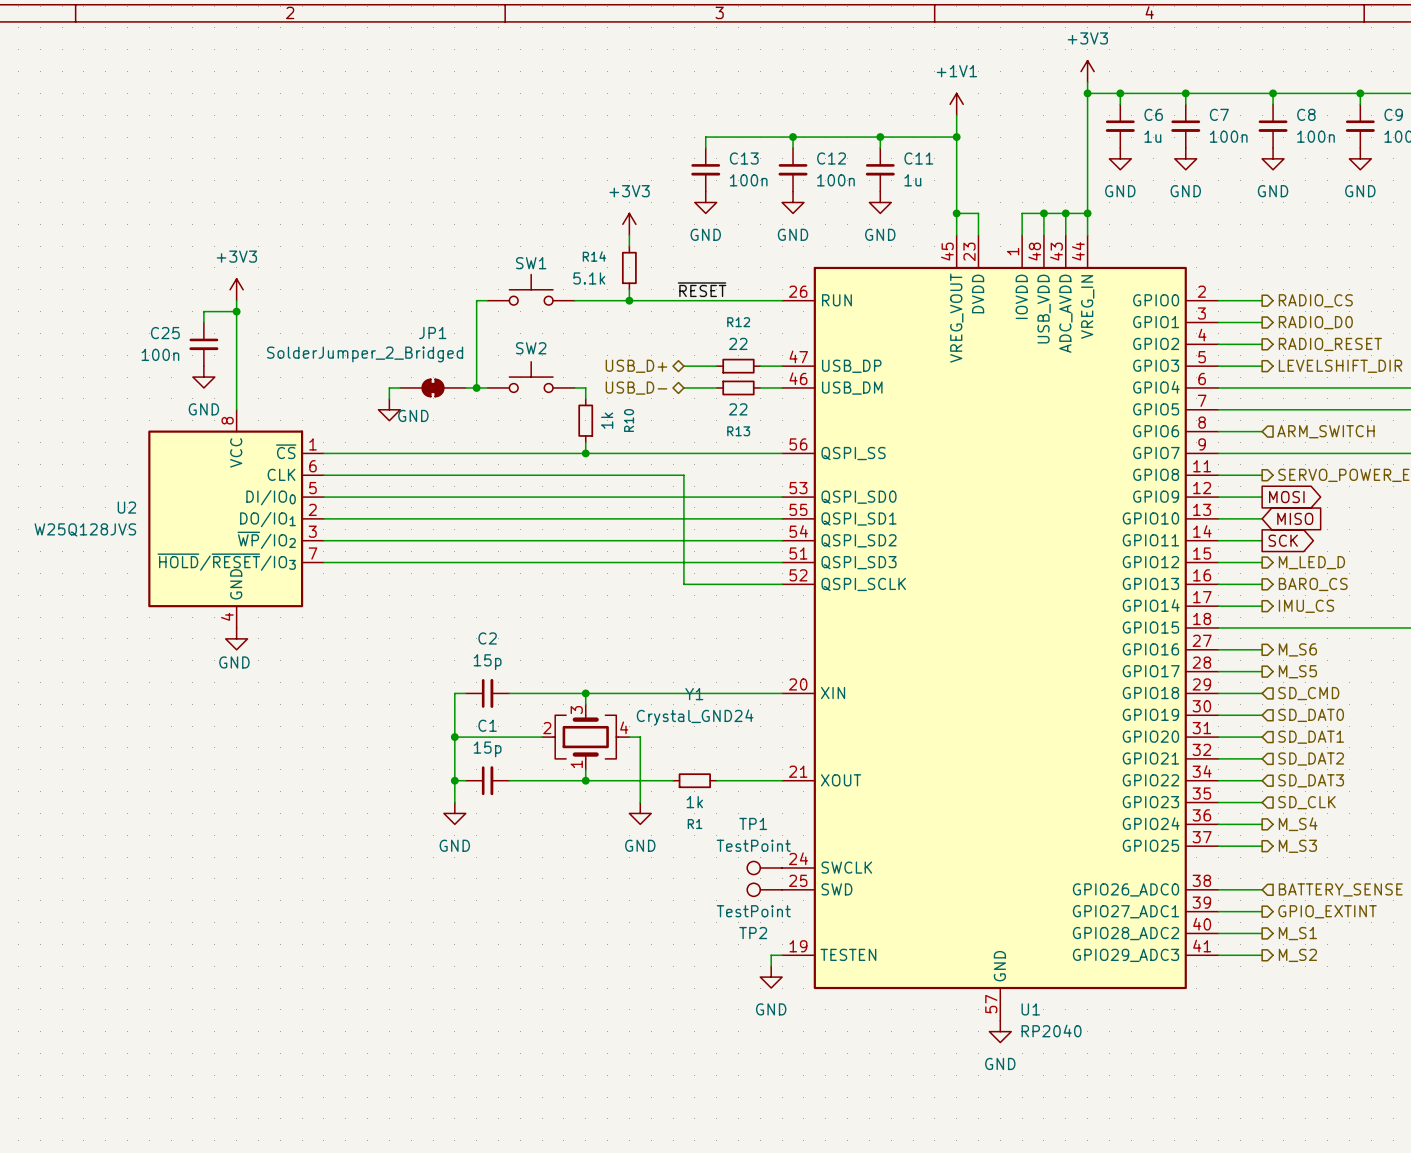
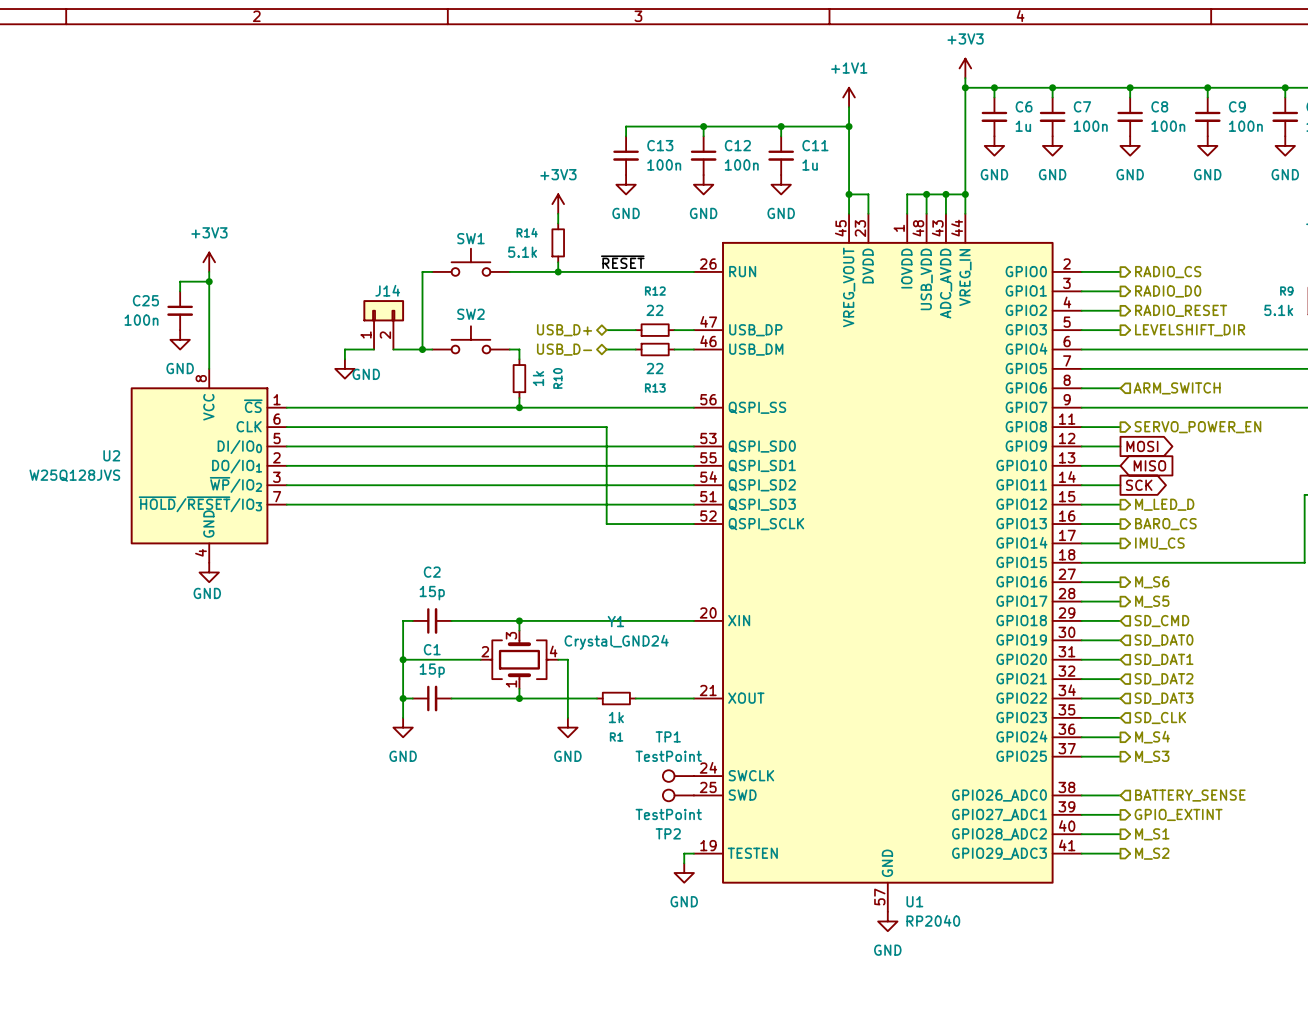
J14: none -> (383, 324)
JP1: SolderJumper_2_Bridged (433, 387) -> none

